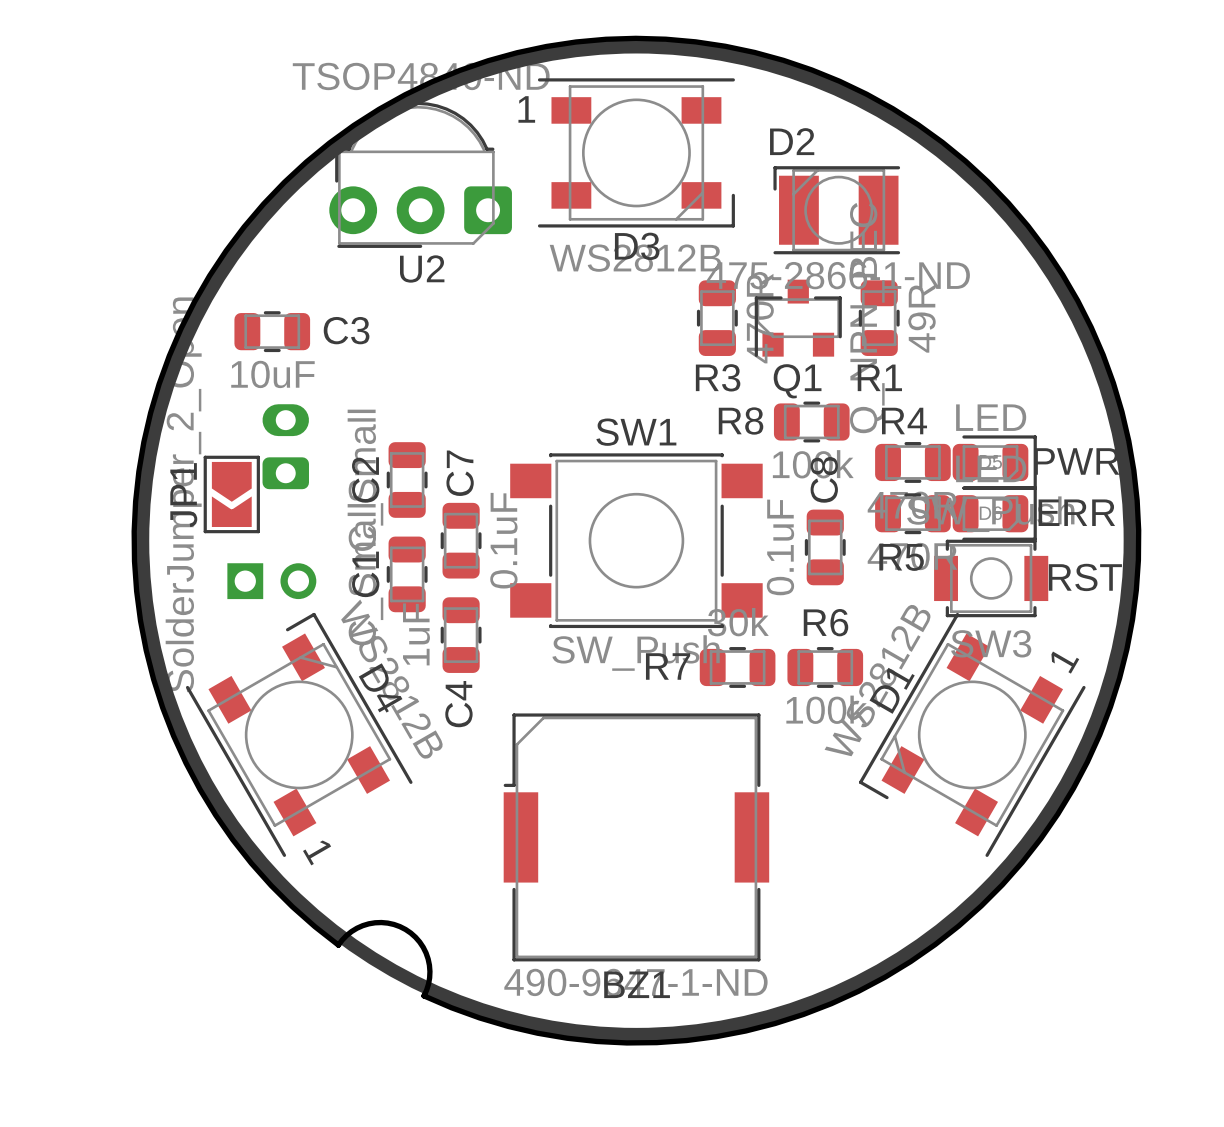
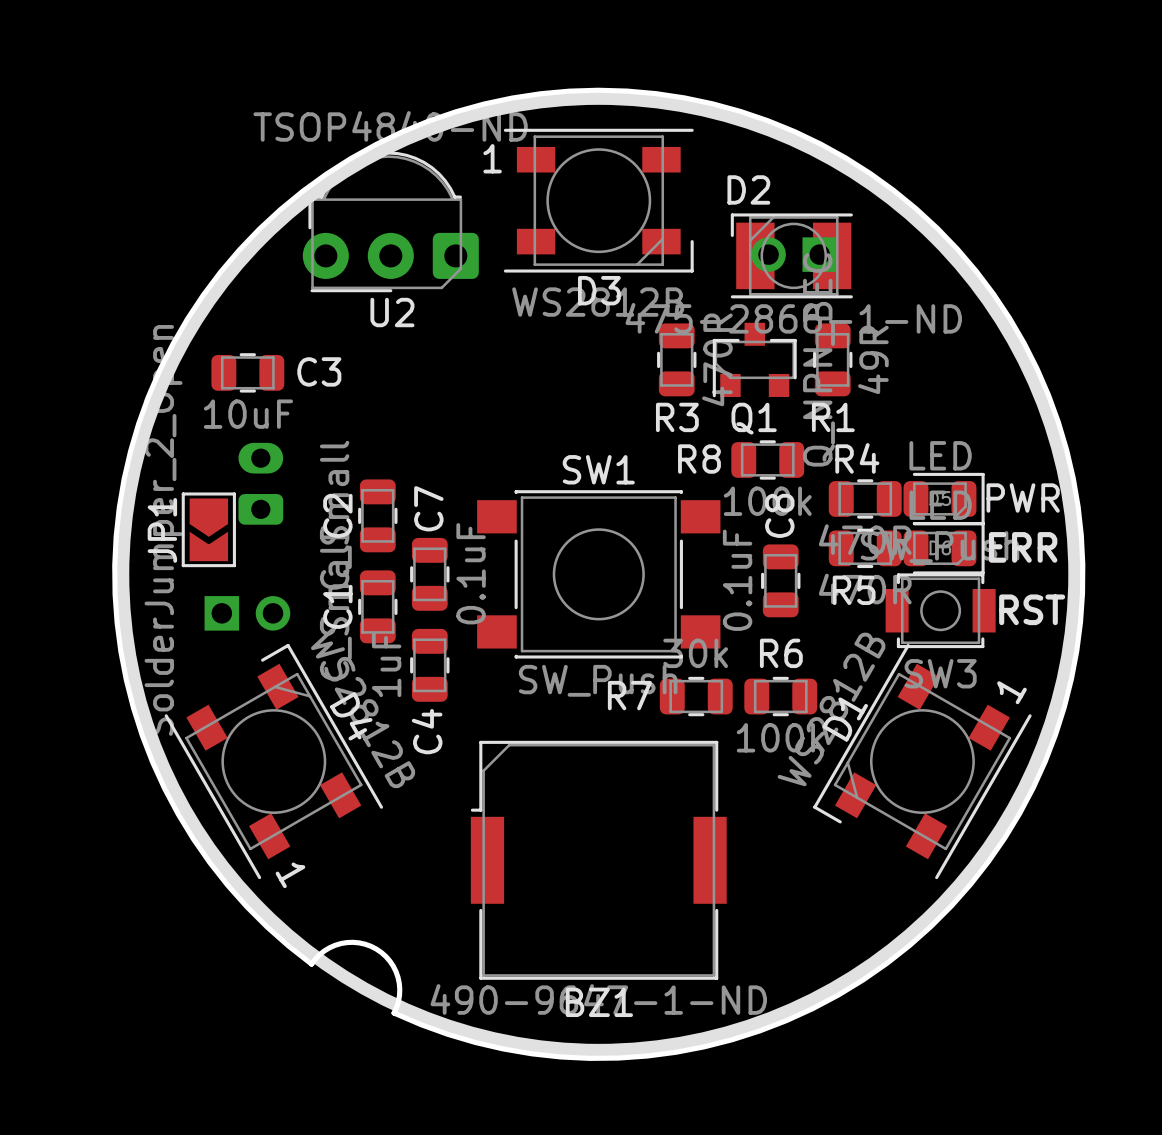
part: none -> (794, 254)

